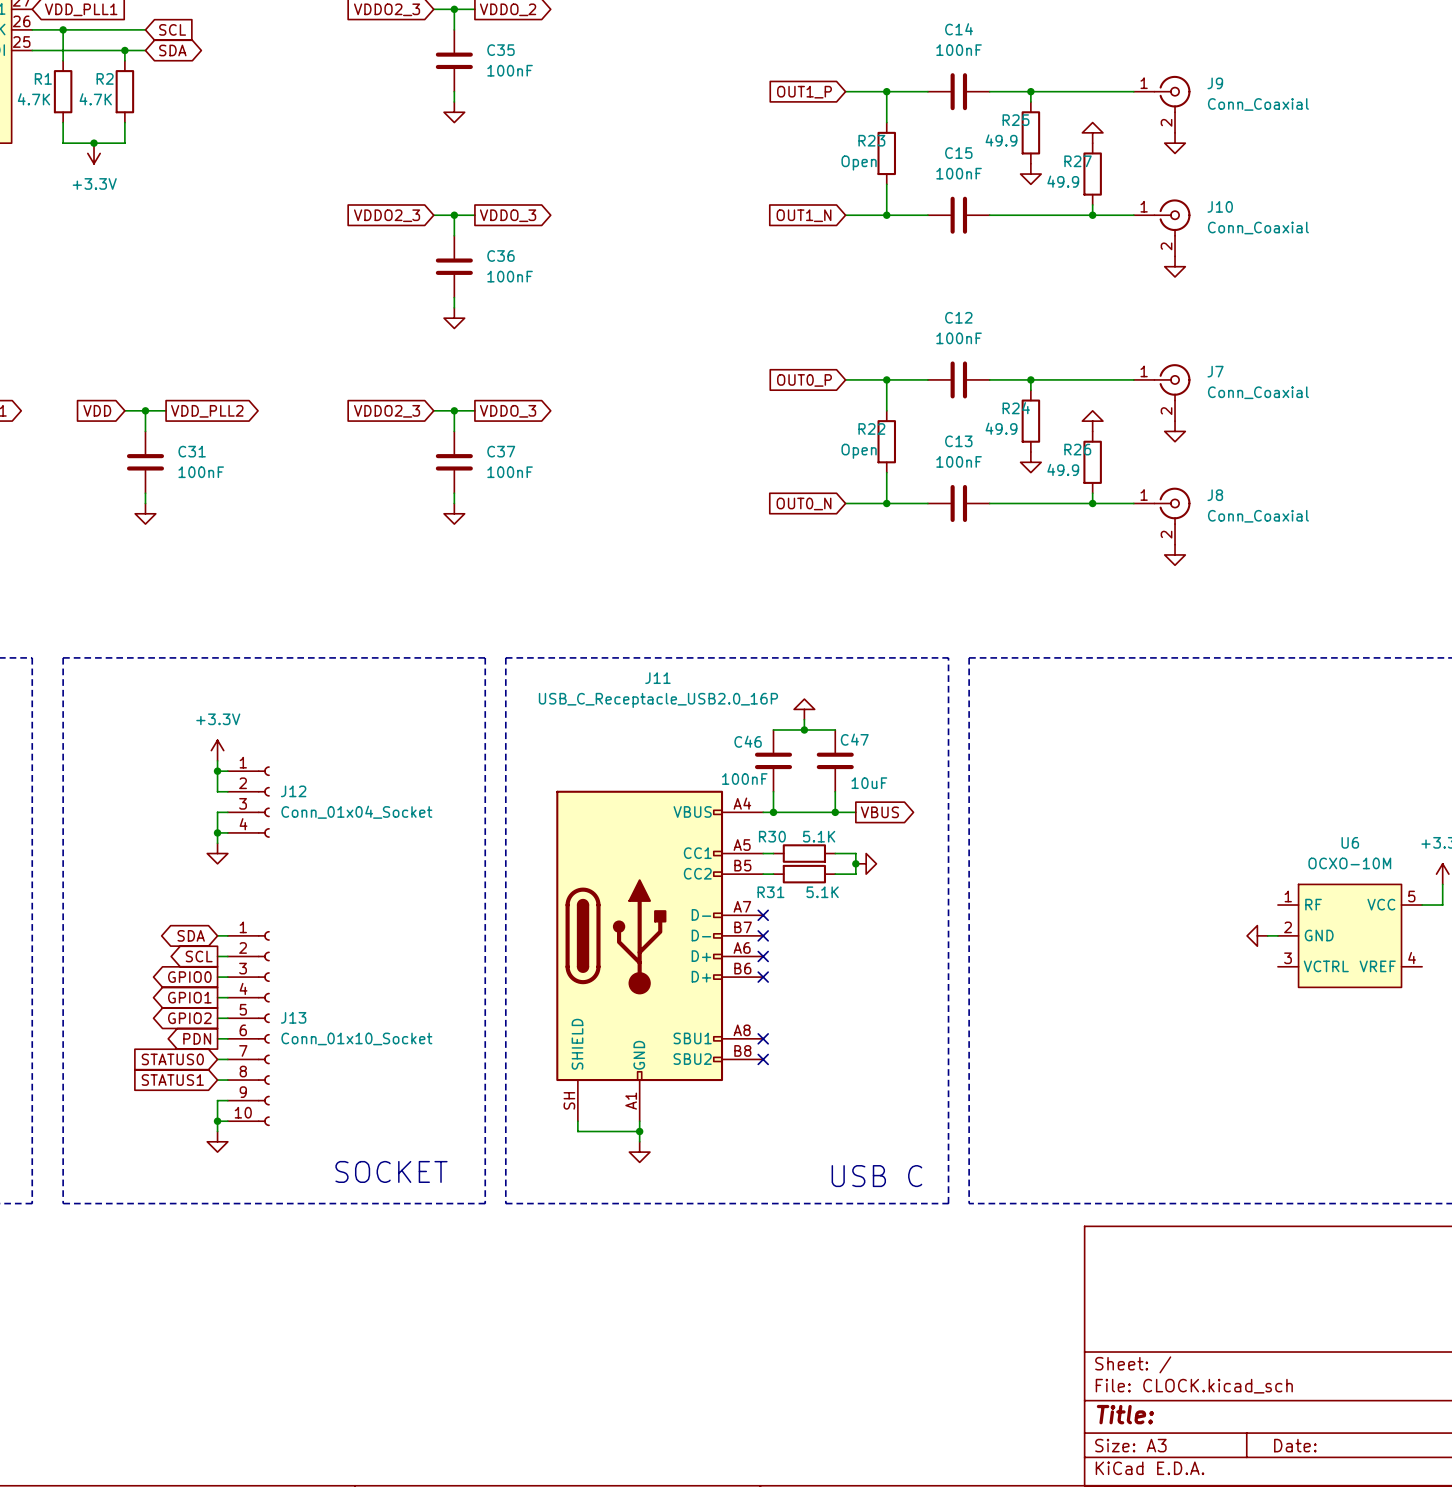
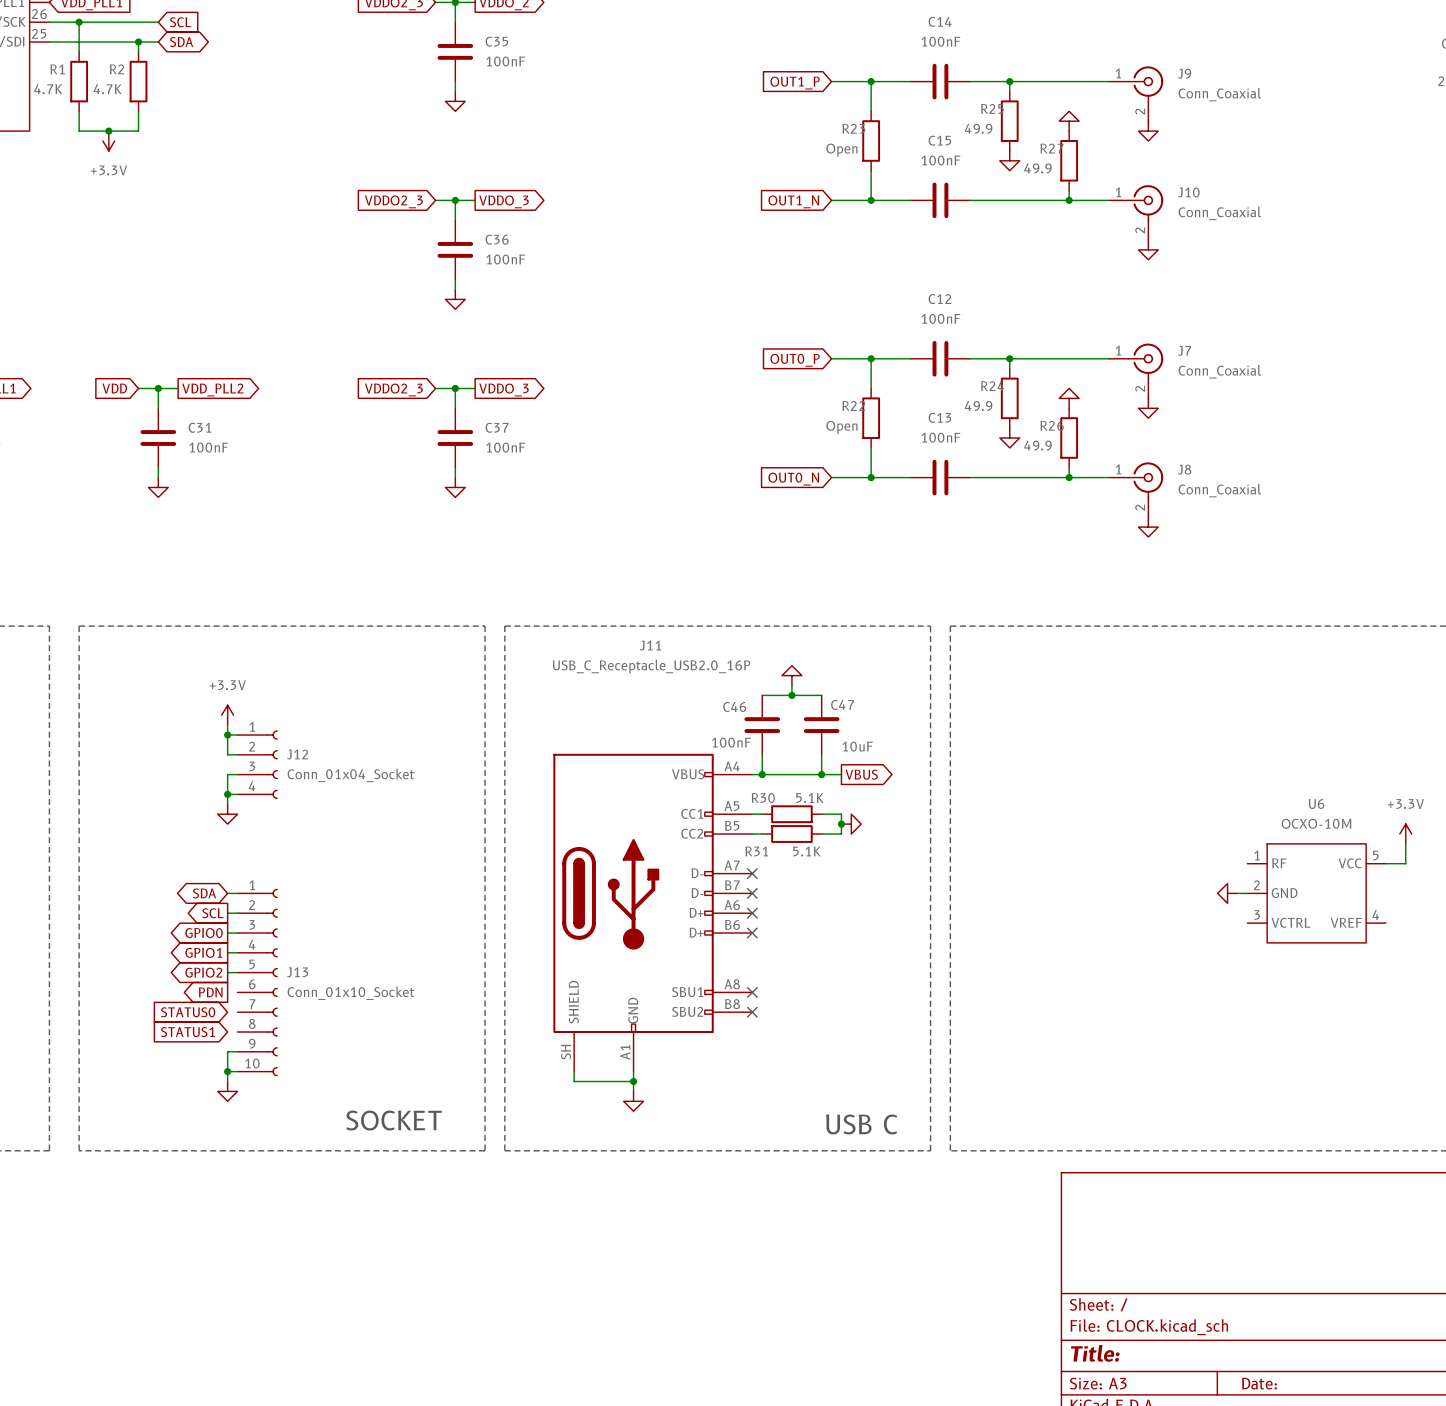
wire: (217, 1038) (227, 1038) -> none
wire: (217, 1059) (227, 1059) -> none
wire: (217, 1080) (227, 1080) -> none

